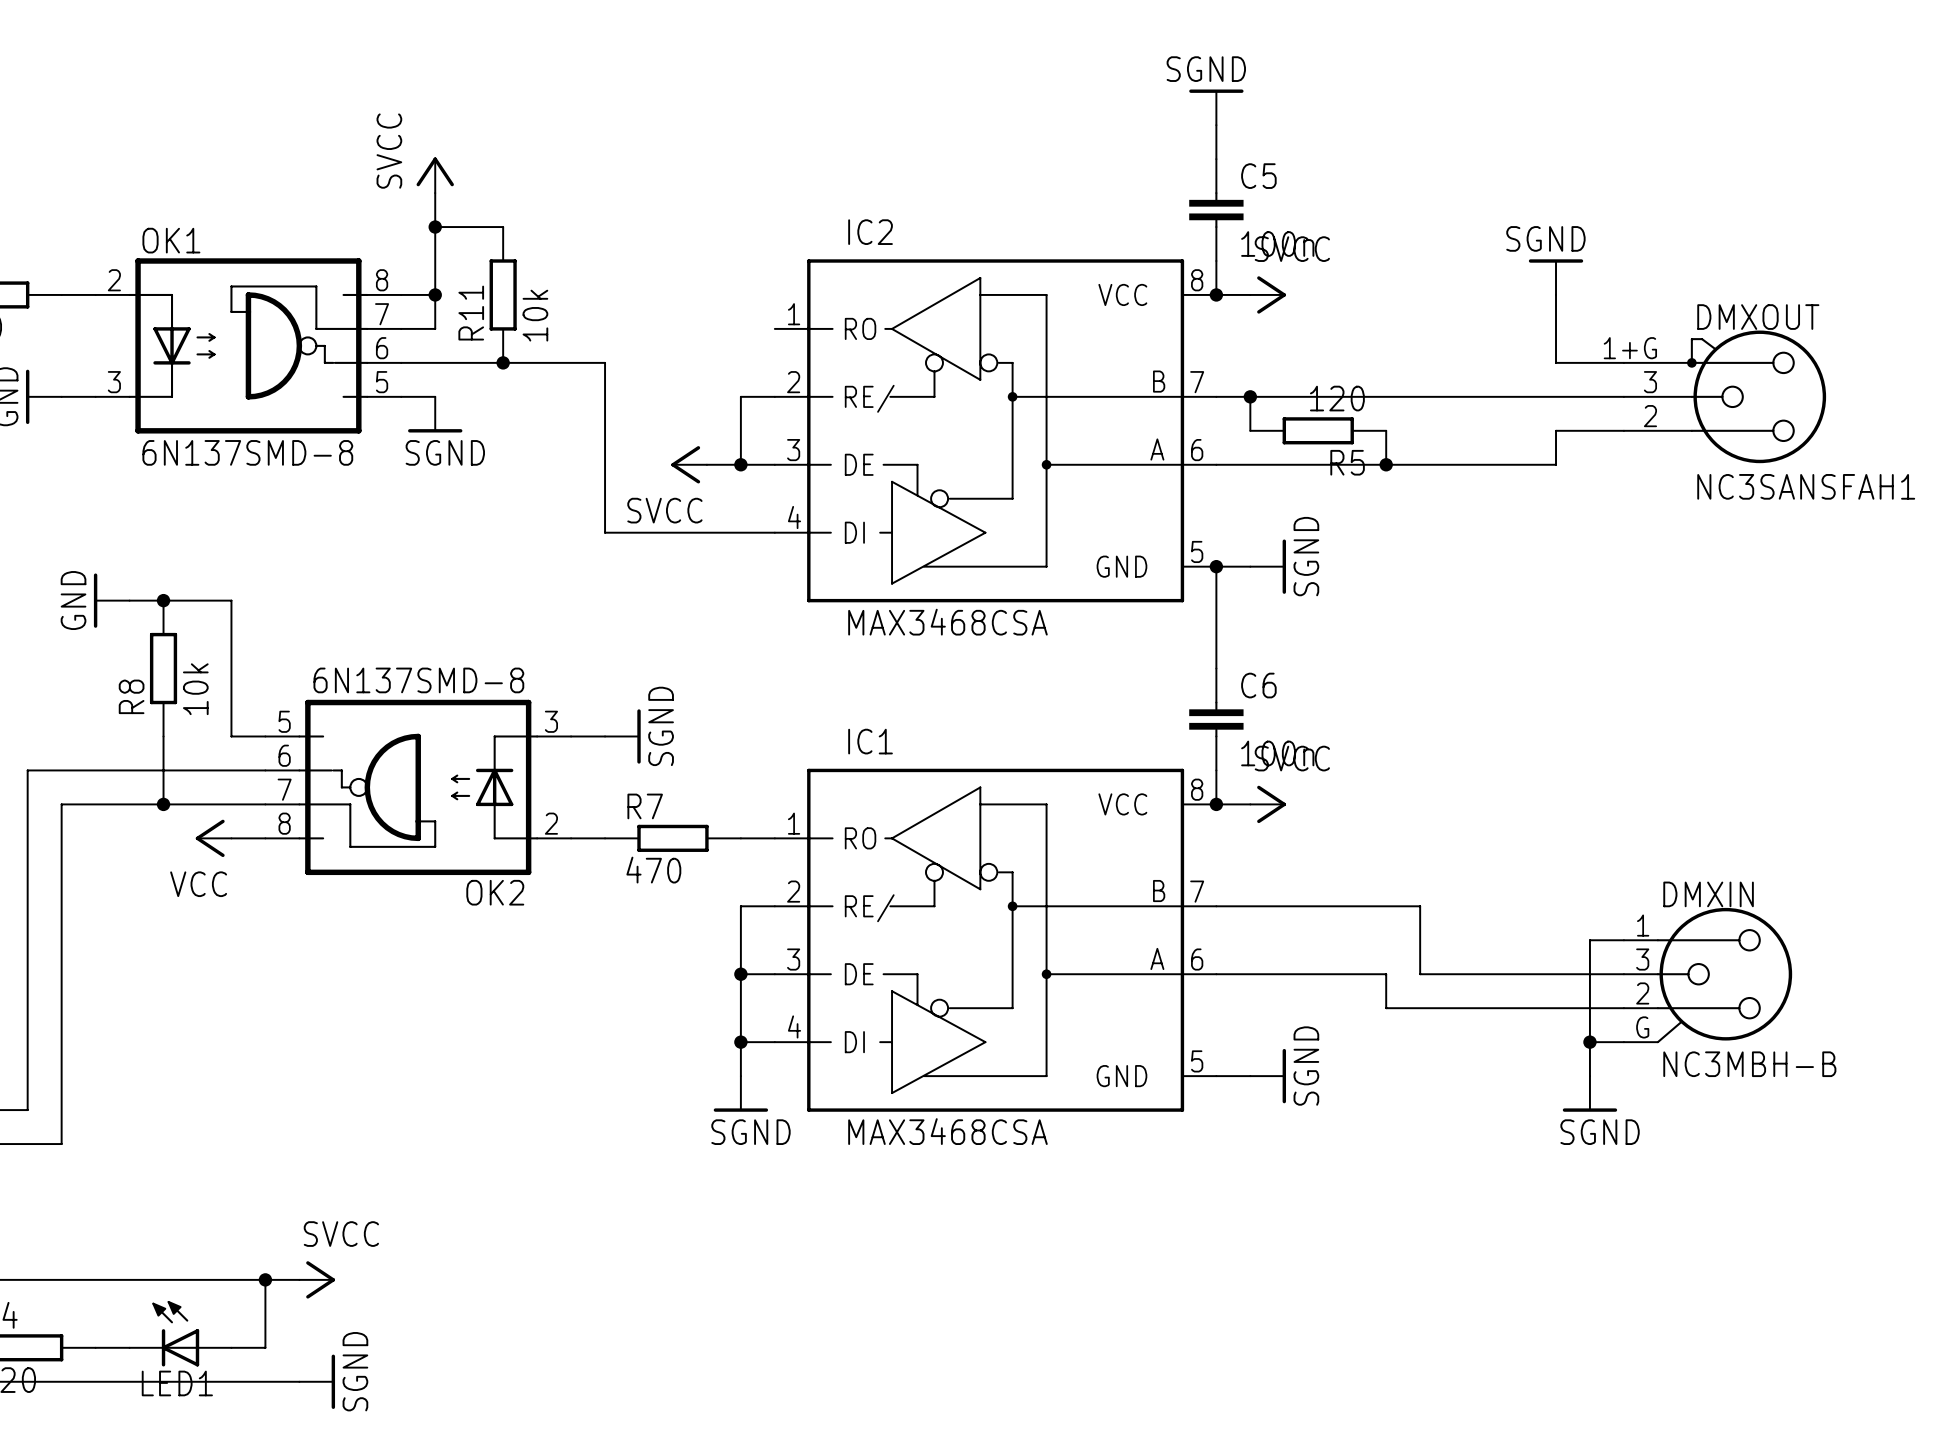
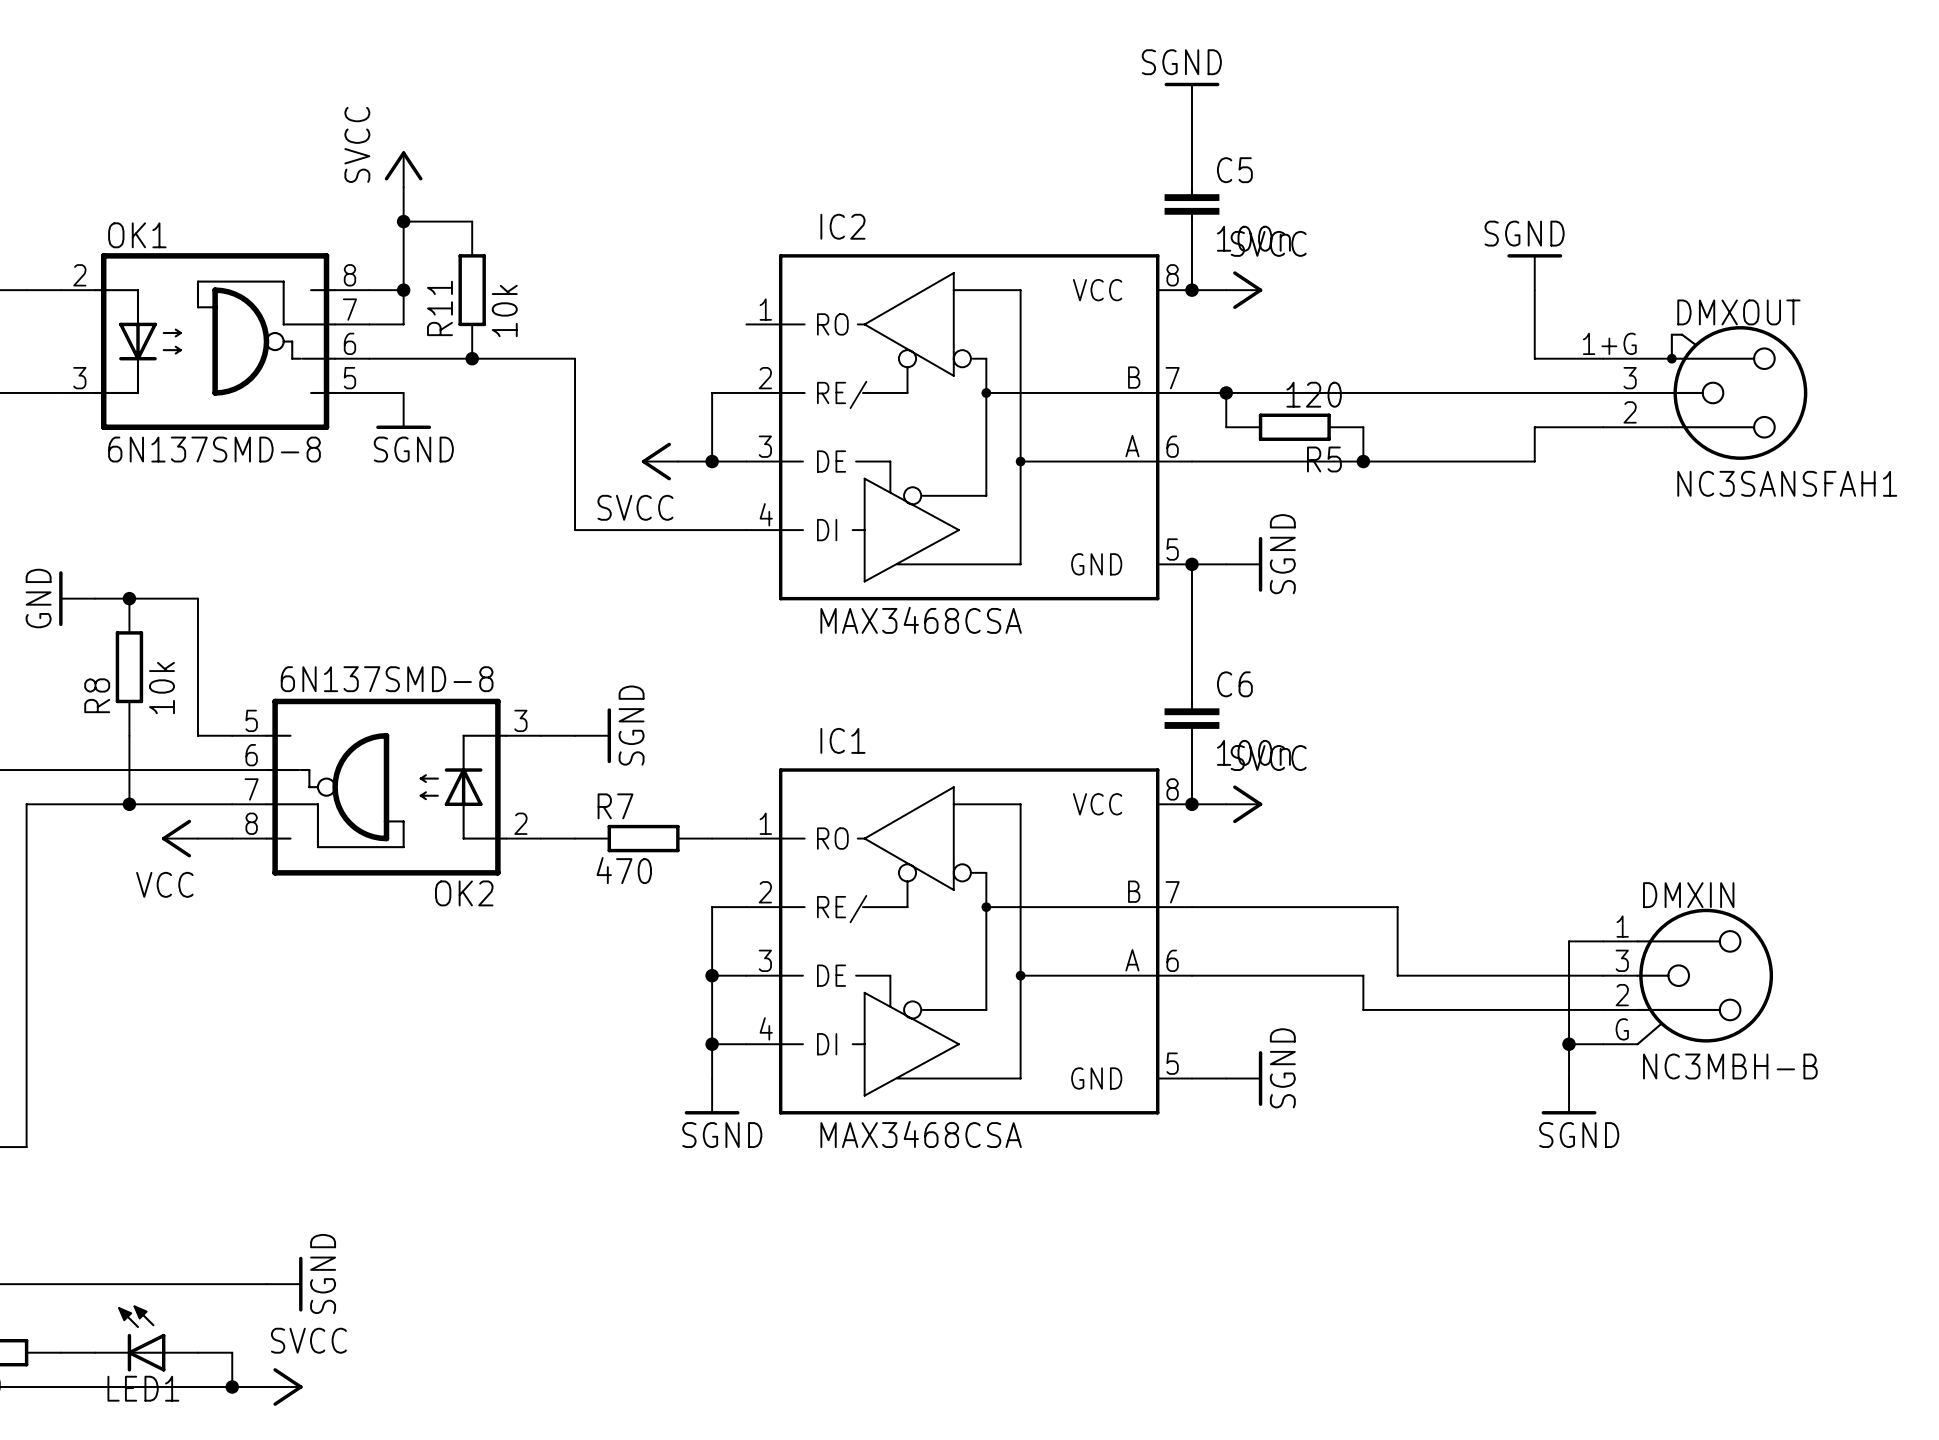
wire: (265, 1279) (265, 1347) -> (232, 1386) (232, 1352)
junction: (265, 1279) -> none
power symbol: SVCC (317, 1279) -> SGND (284, 1284)
junction: none -> (232, 1386)
power symbol: SGND (317, 1381) -> SVCC (284, 1386)

